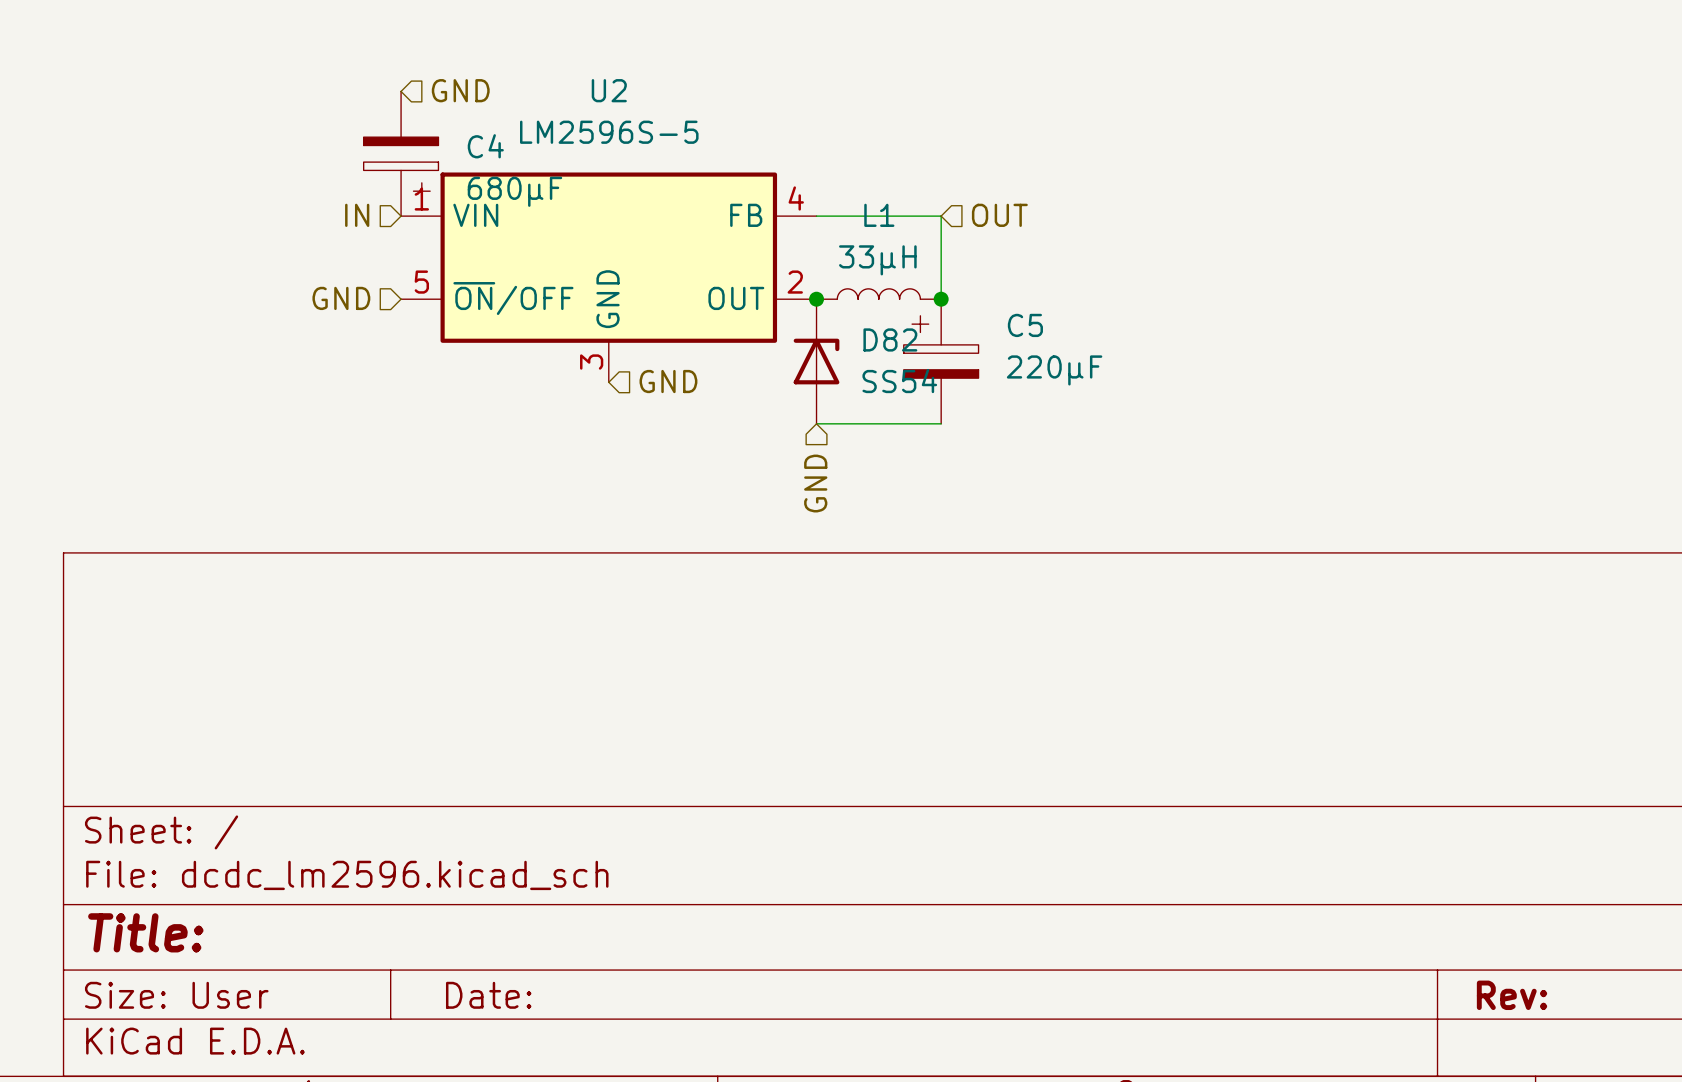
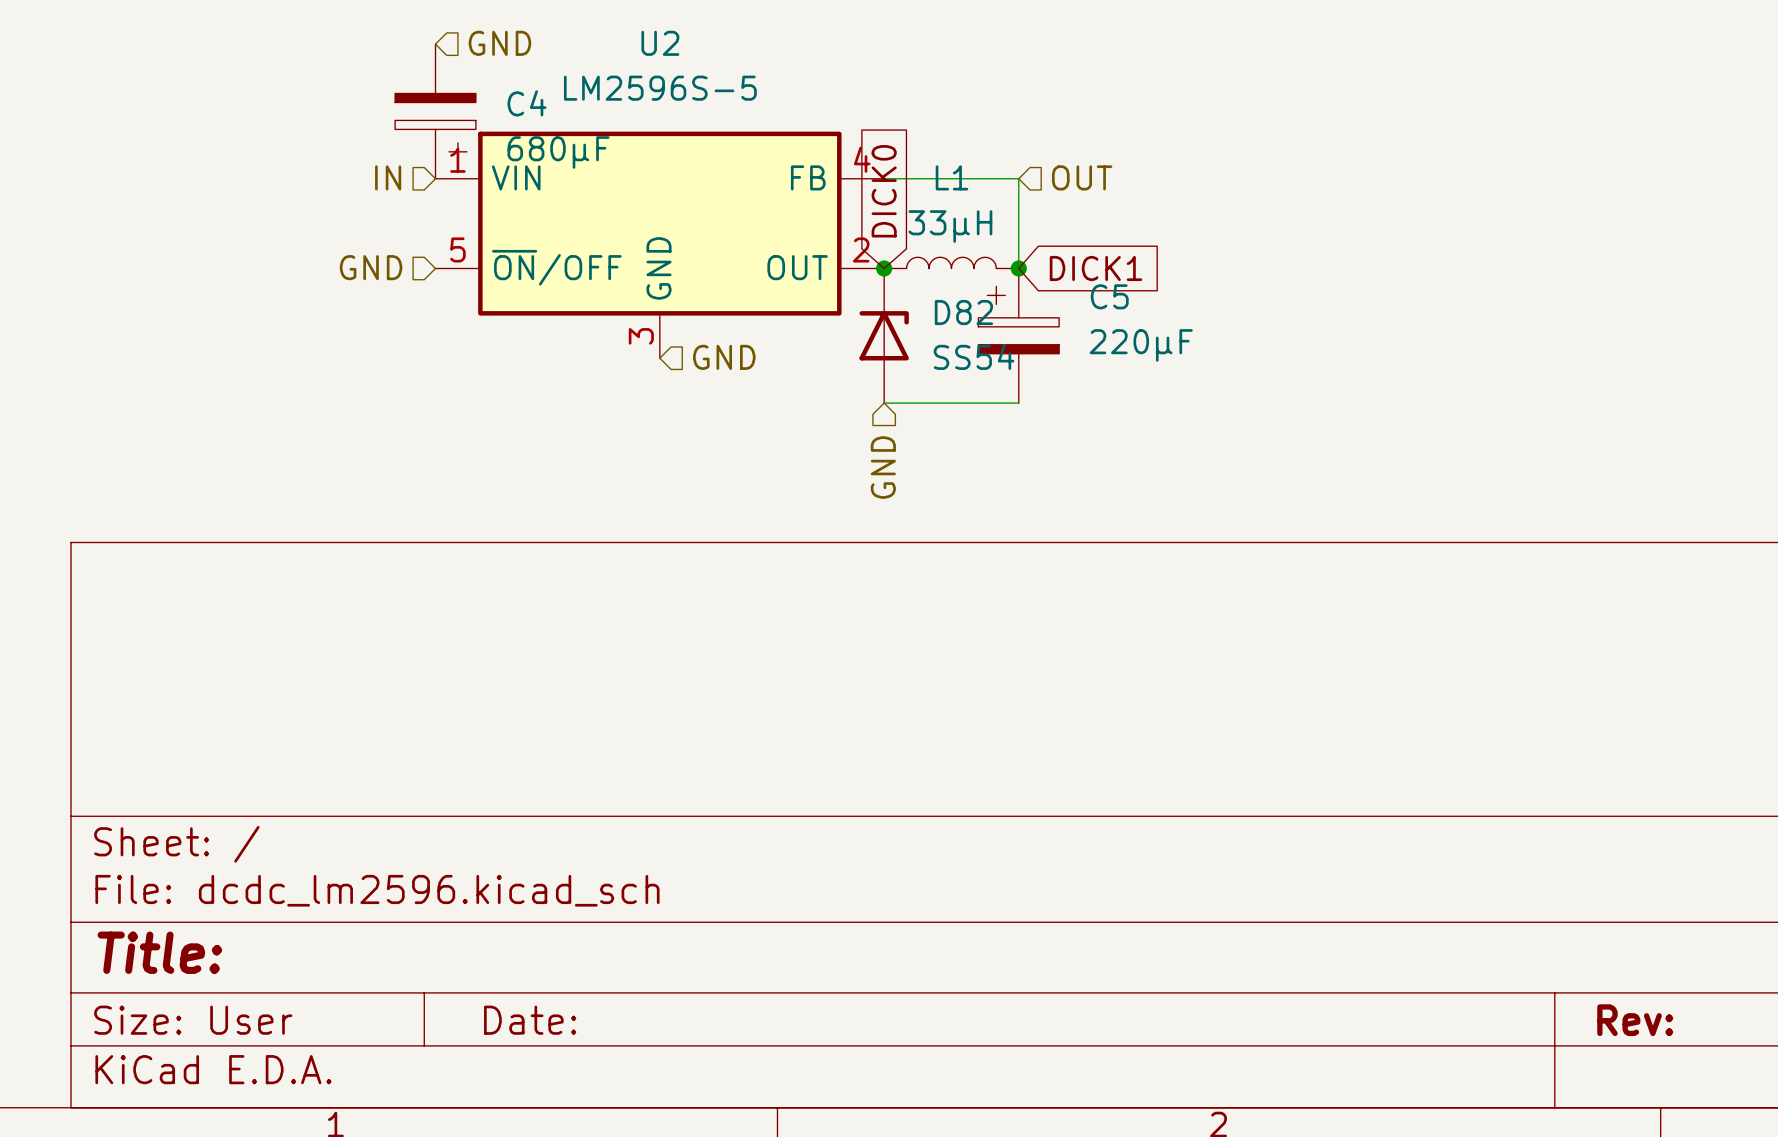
global label: none -> DICK0 (884, 191)
global label: none -> DICK1 (1095, 268)

